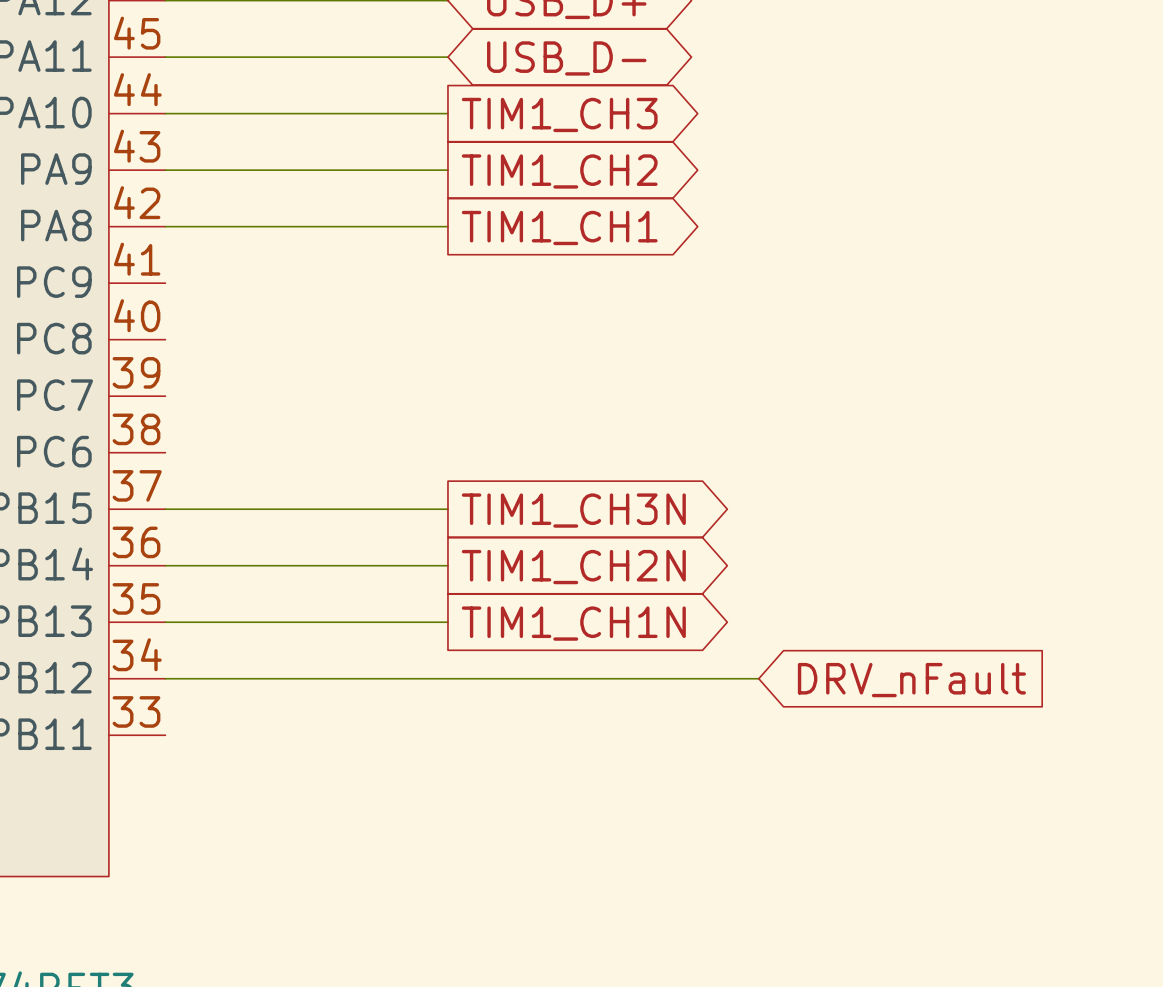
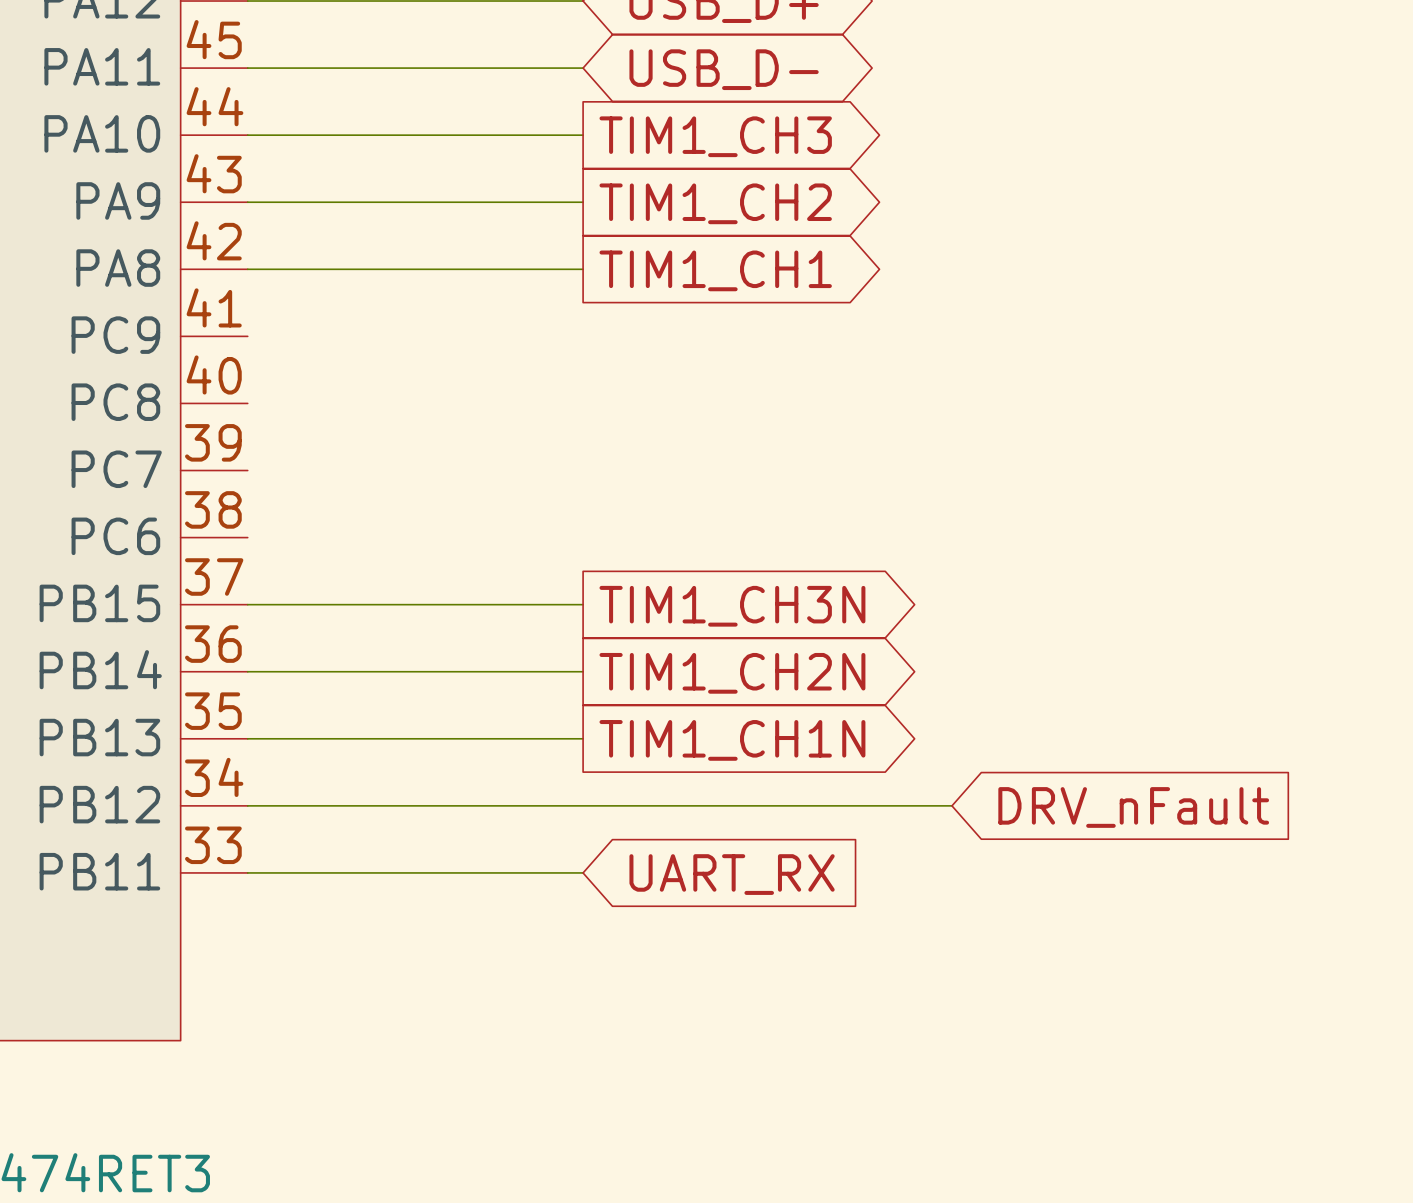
wire: none -> (247, 872) (583, 872)
global label: none -> UART_RX (732, 874)

